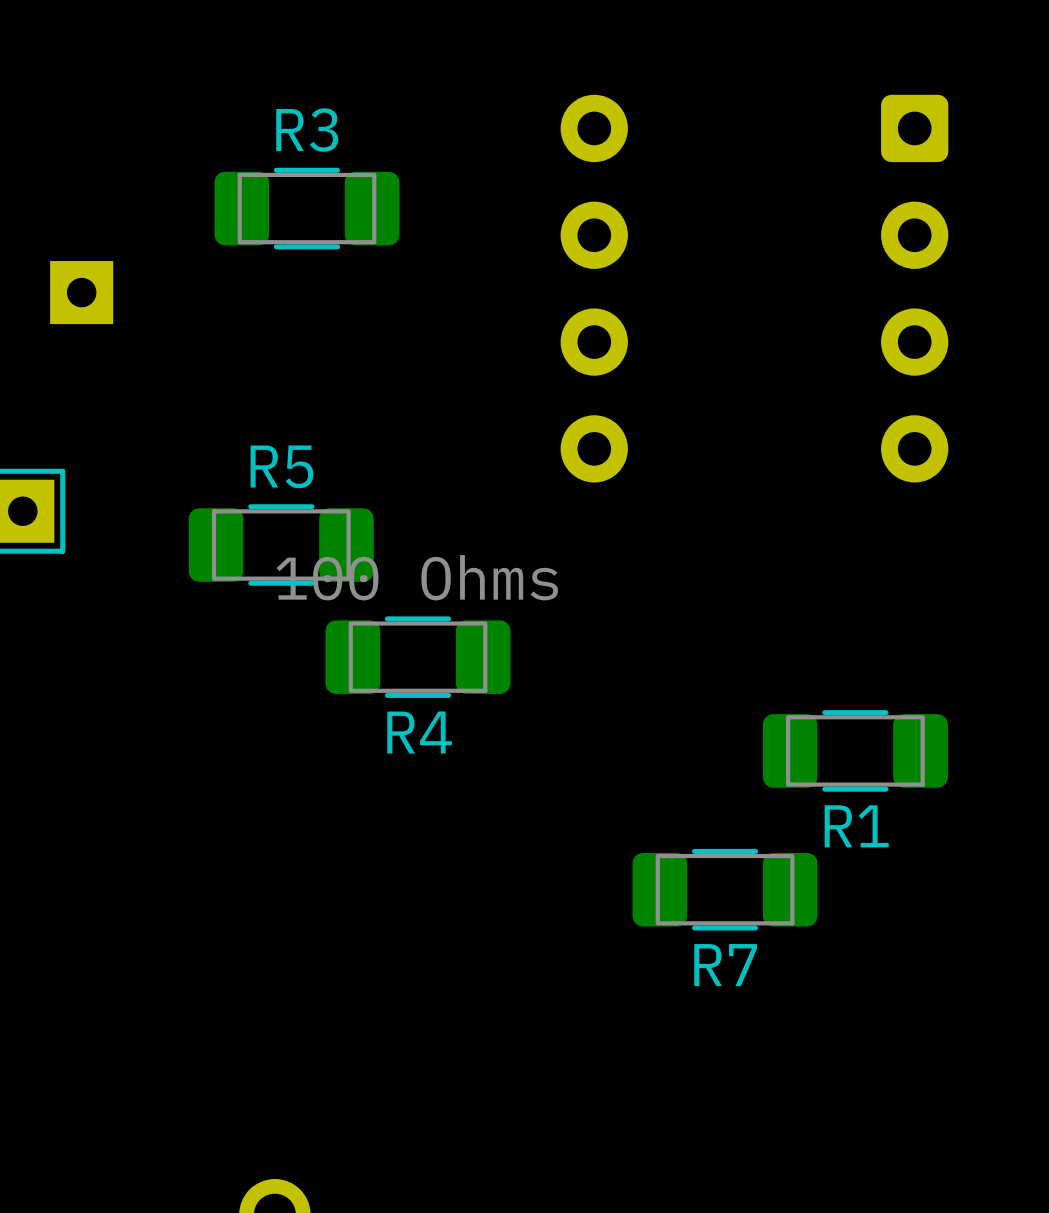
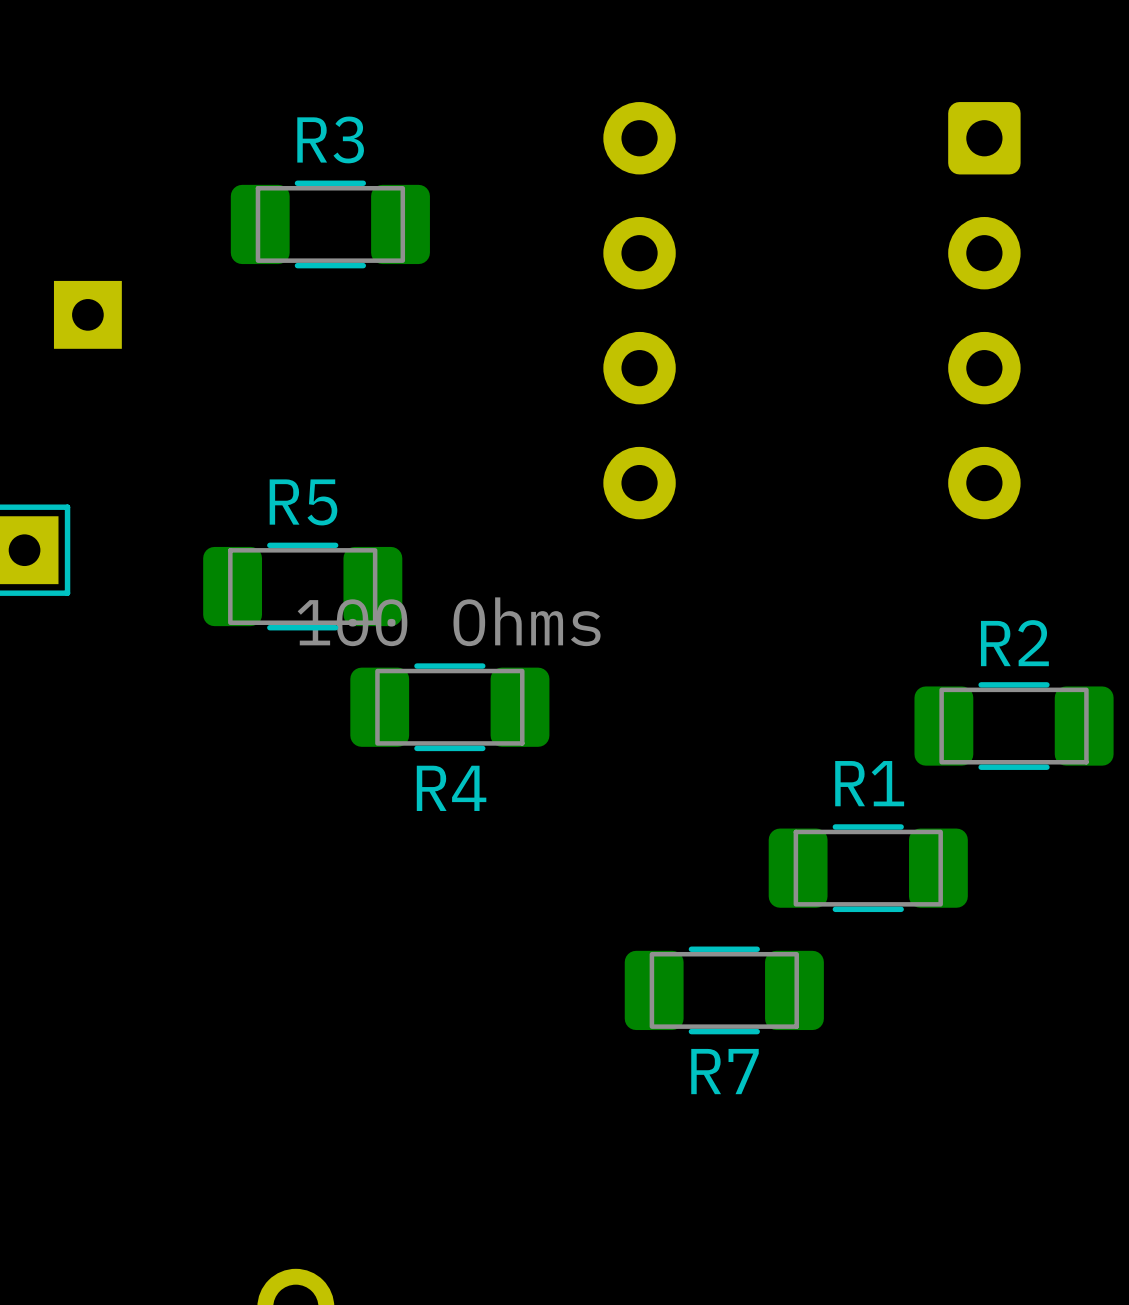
R2: none -> (1014, 726)
R1 position: (855, 750) -> (868, 868)
R1 name position: R1 (856, 826) -> R1 (869, 783)
R7 position: (725, 889) -> (724, 990)

